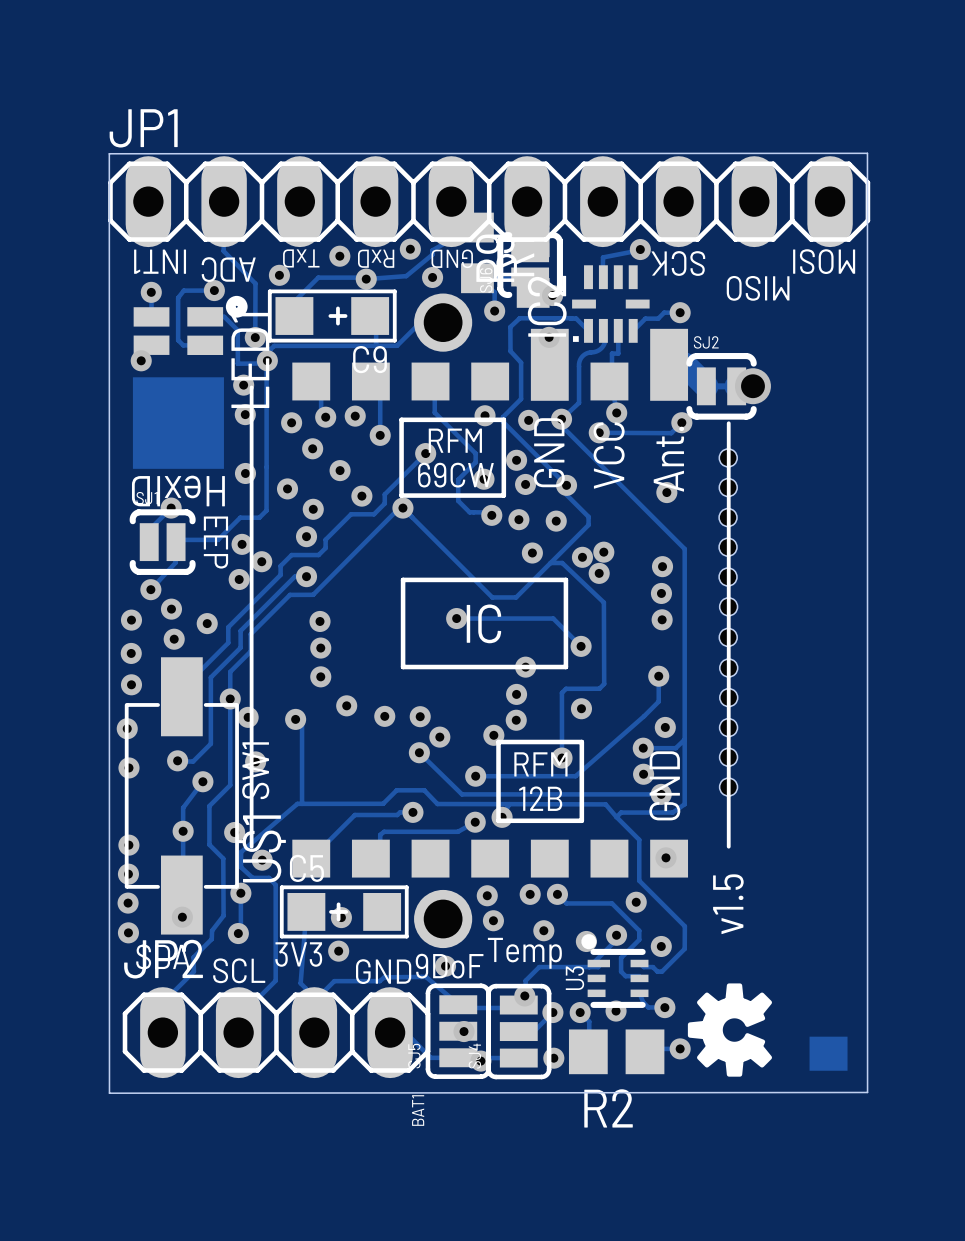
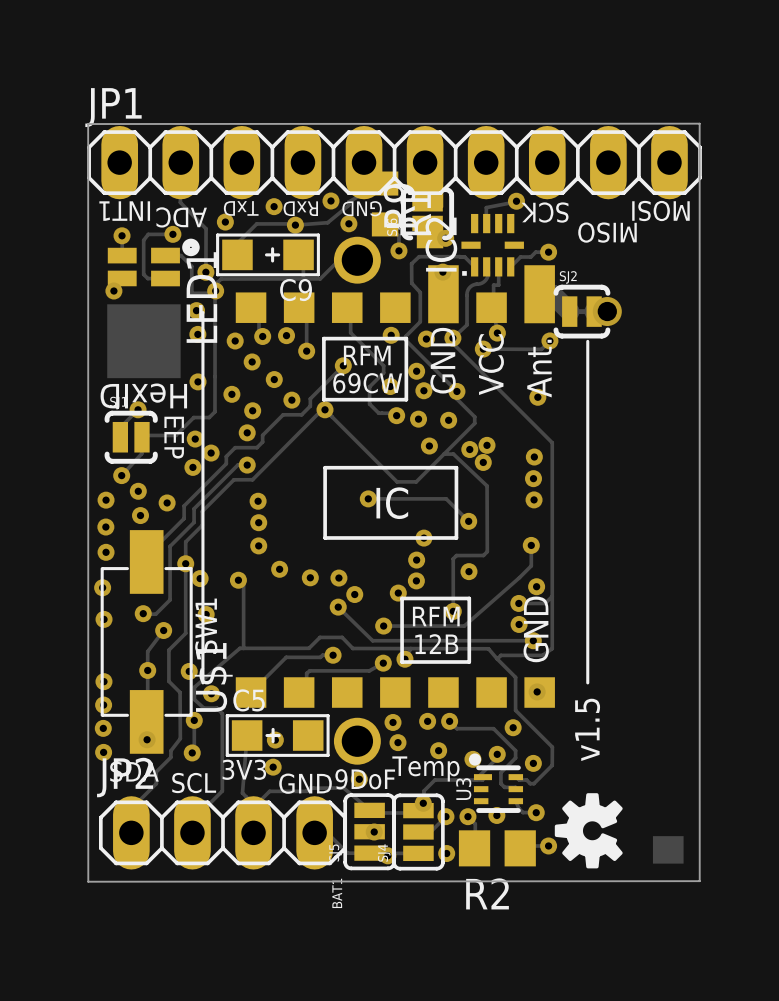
hole: (728, 457) -> none
hole: (728, 487) -> none
hole: (728, 517) -> none
hole: (728, 547) -> none
hole: (728, 577) -> none
hole: (728, 606) -> none
hole: (728, 637) -> none
hole: (728, 667) -> none
hole: (728, 697) -> none
hole: (728, 727) -> none
hole: (728, 757) -> none
hole: (728, 787) -> none

